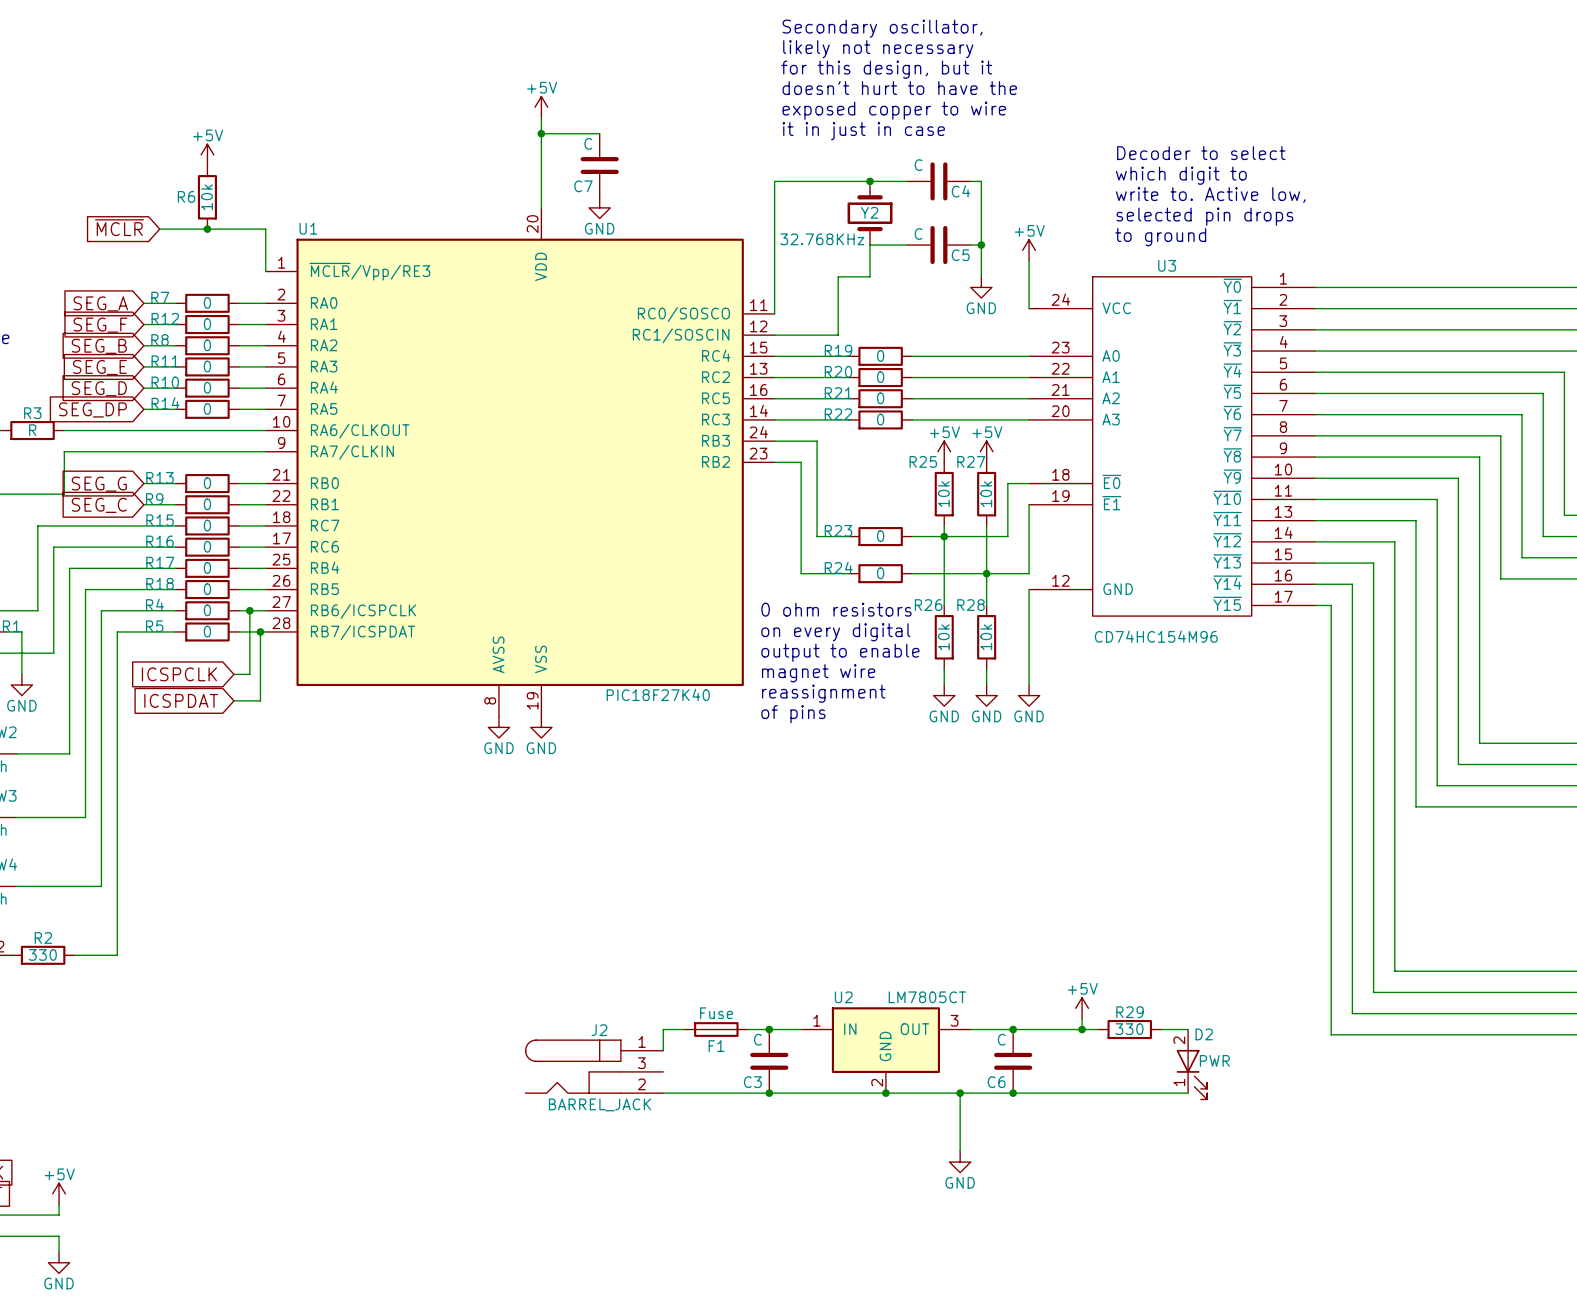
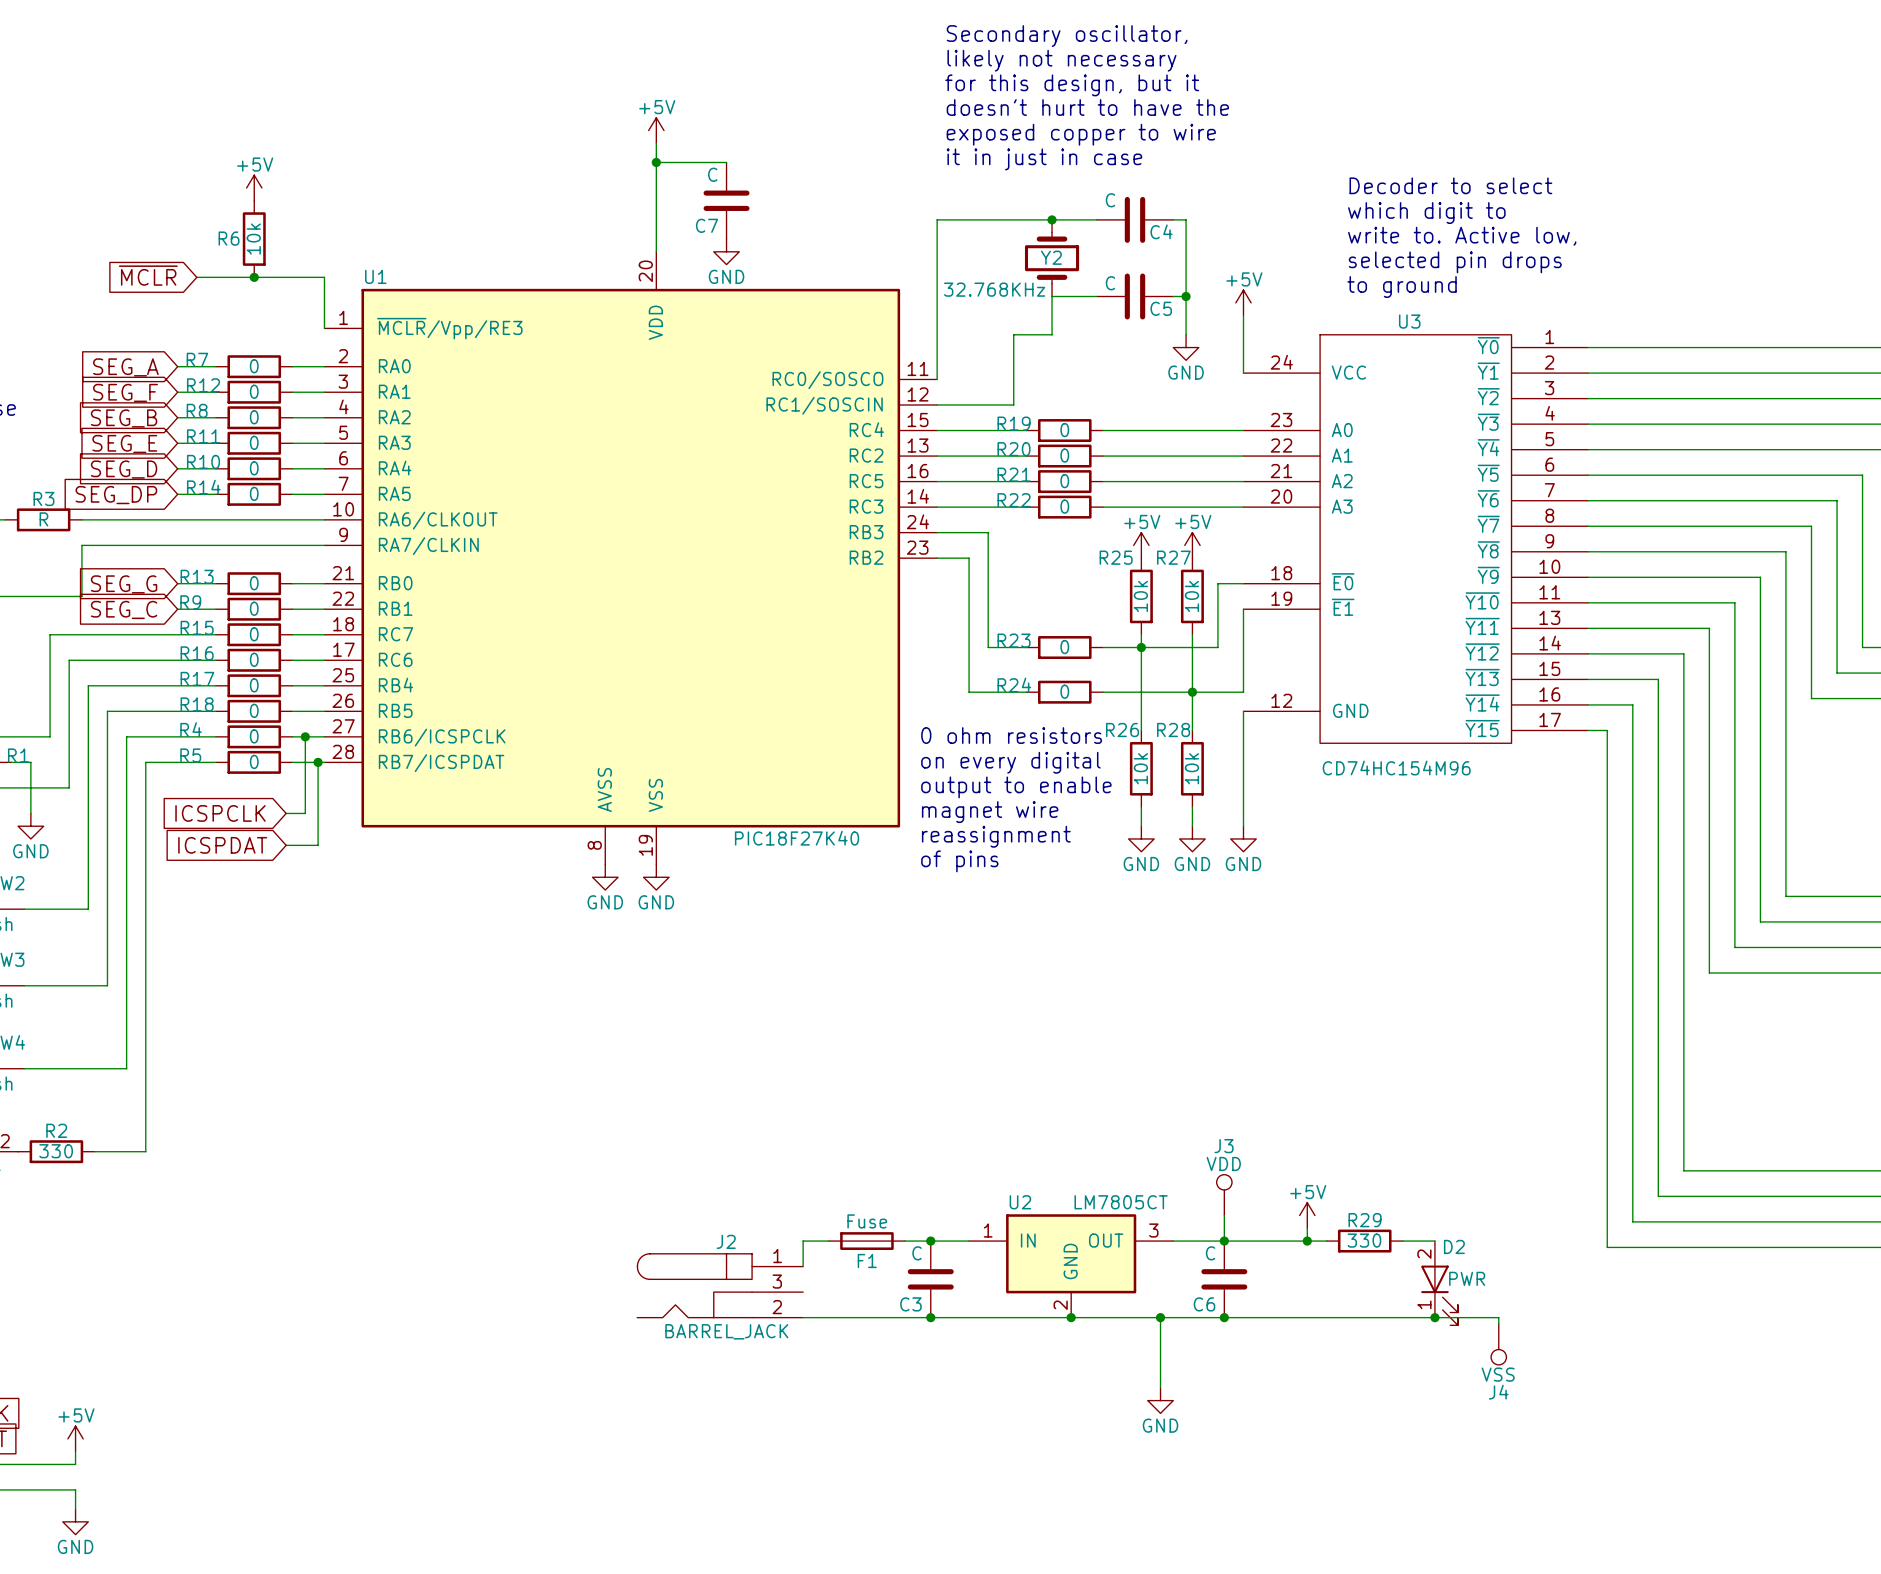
J3: none -> VDD (1224, 1195)
wire: none -> (1224, 1215) (1224, 1241)
wire: none -> (1434, 1317) (1498, 1317) (1498, 1324)
junction: none -> (1434, 1317)
J4: none -> VSS (1498, 1344)

